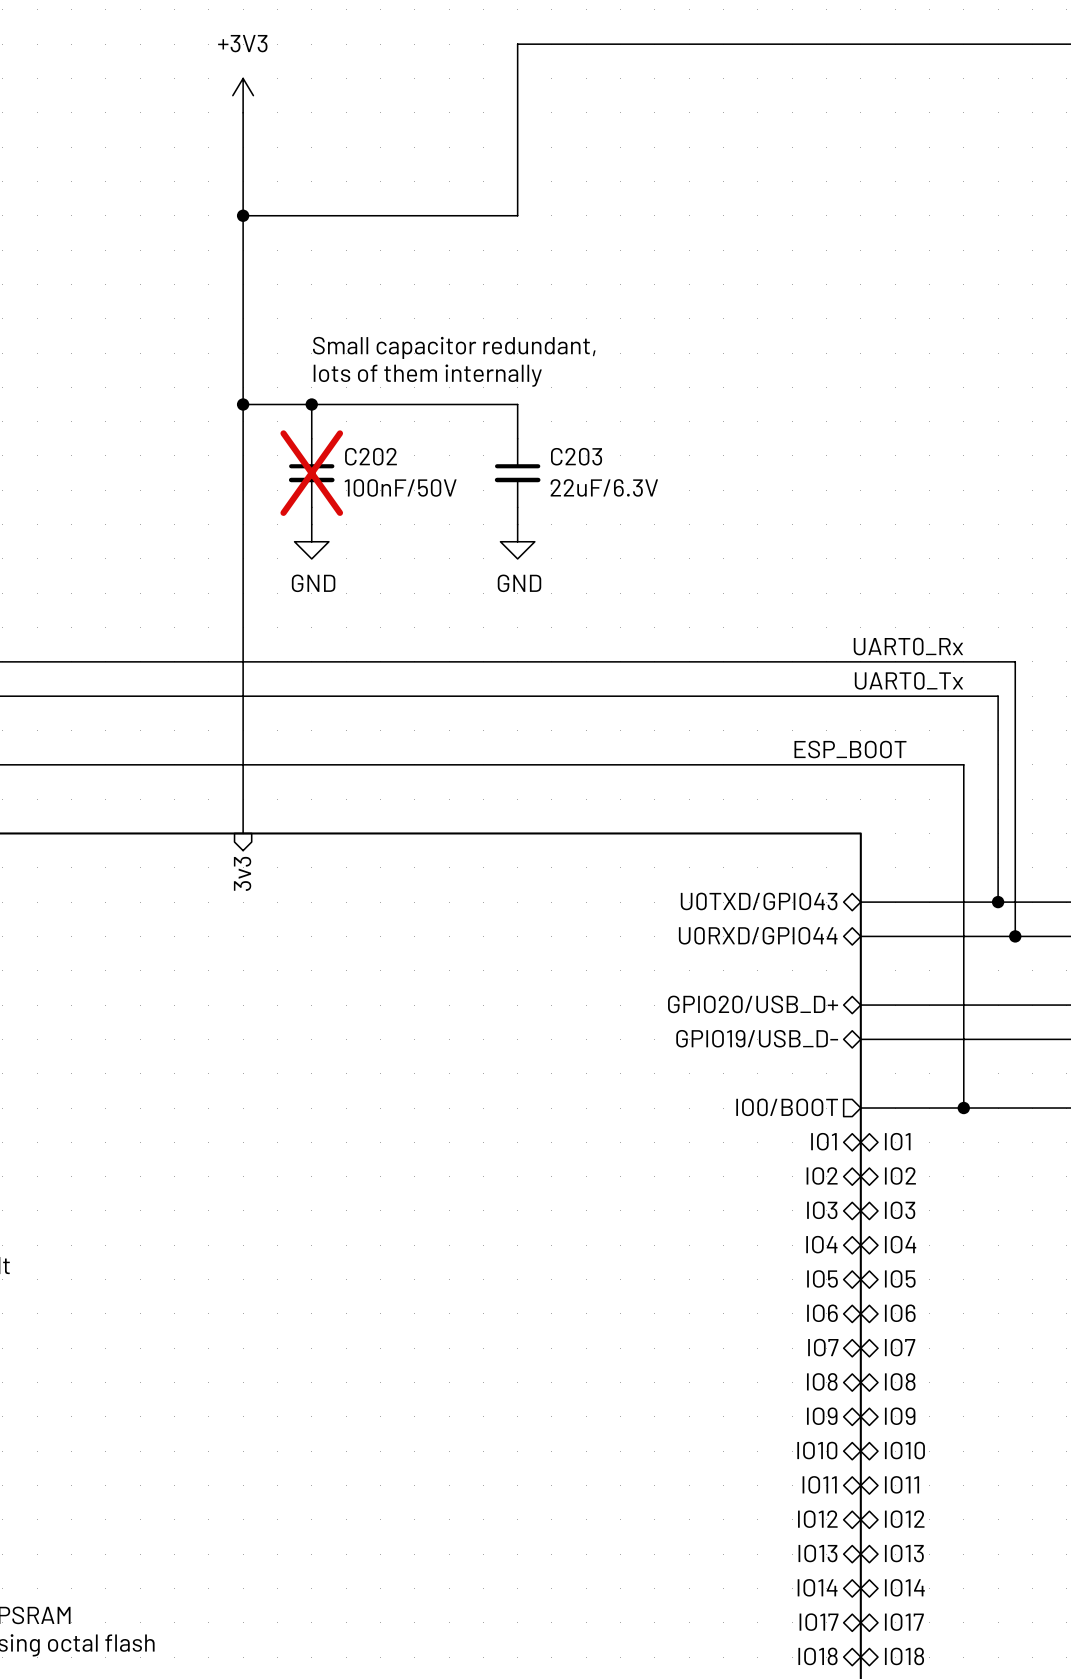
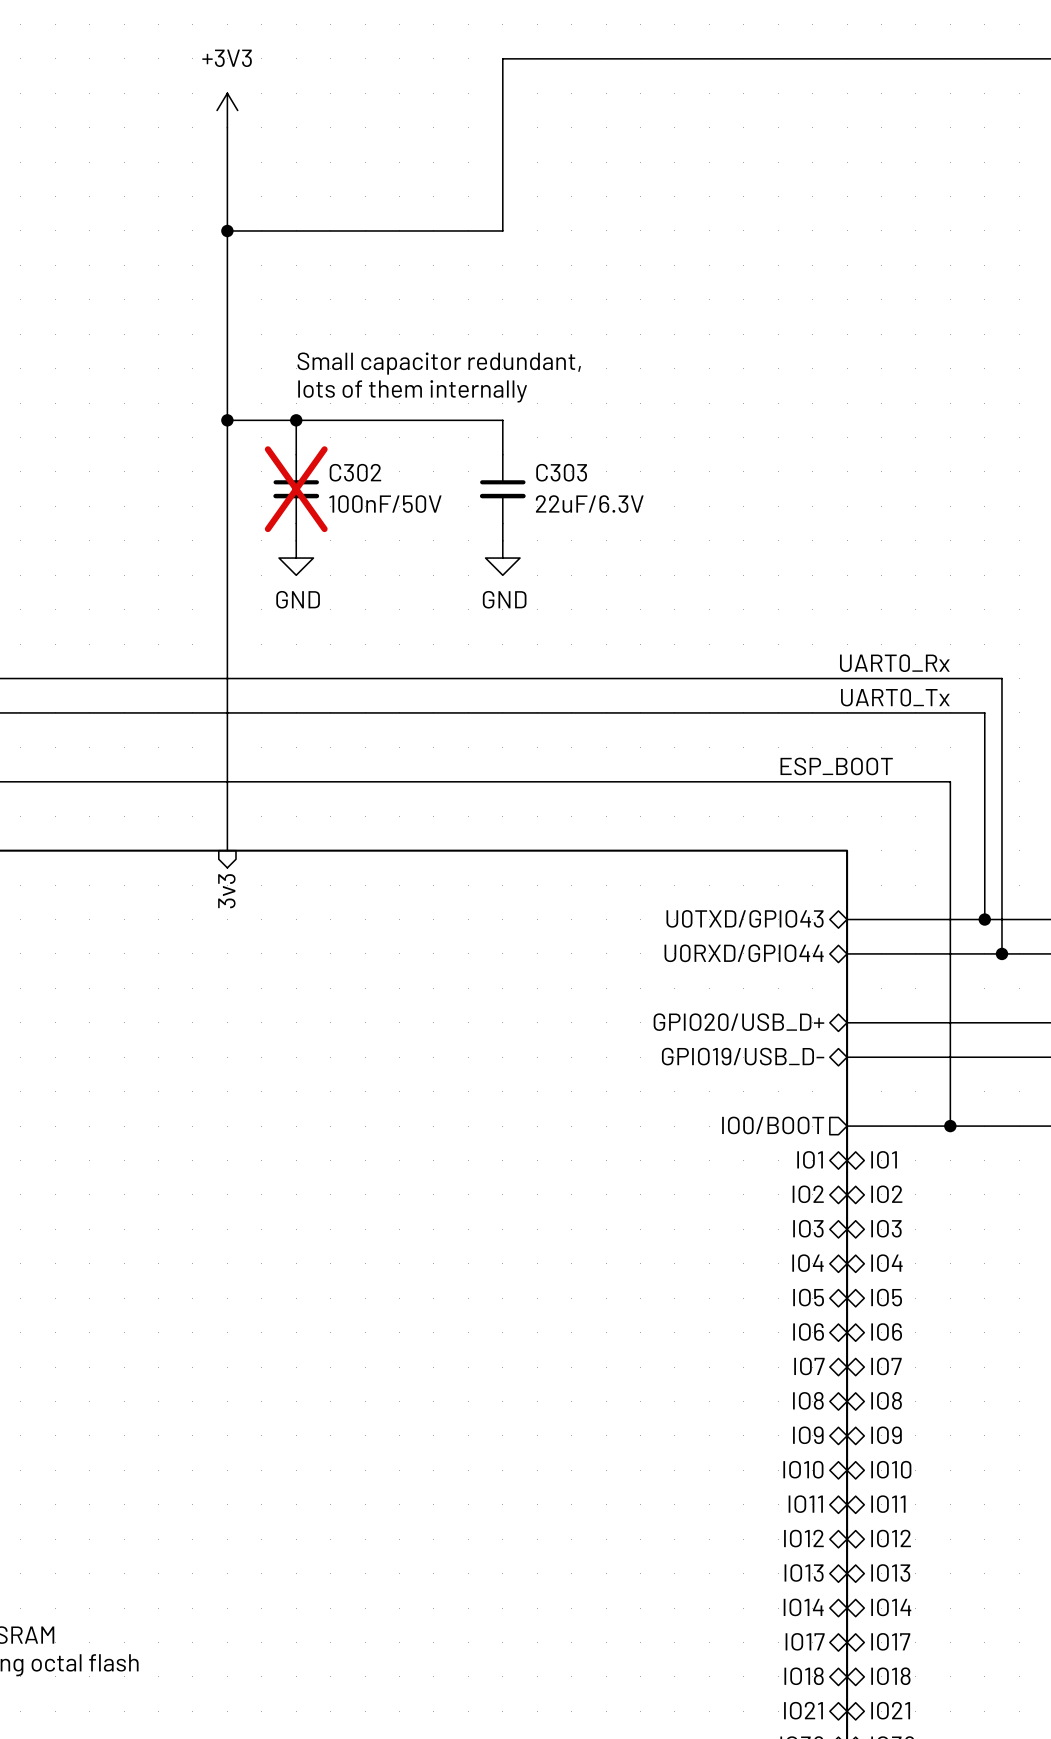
C202 name: C202 (370, 456) -> C302 (355, 472)
C203 name: C203 (576, 456) -> C303 (561, 472)

